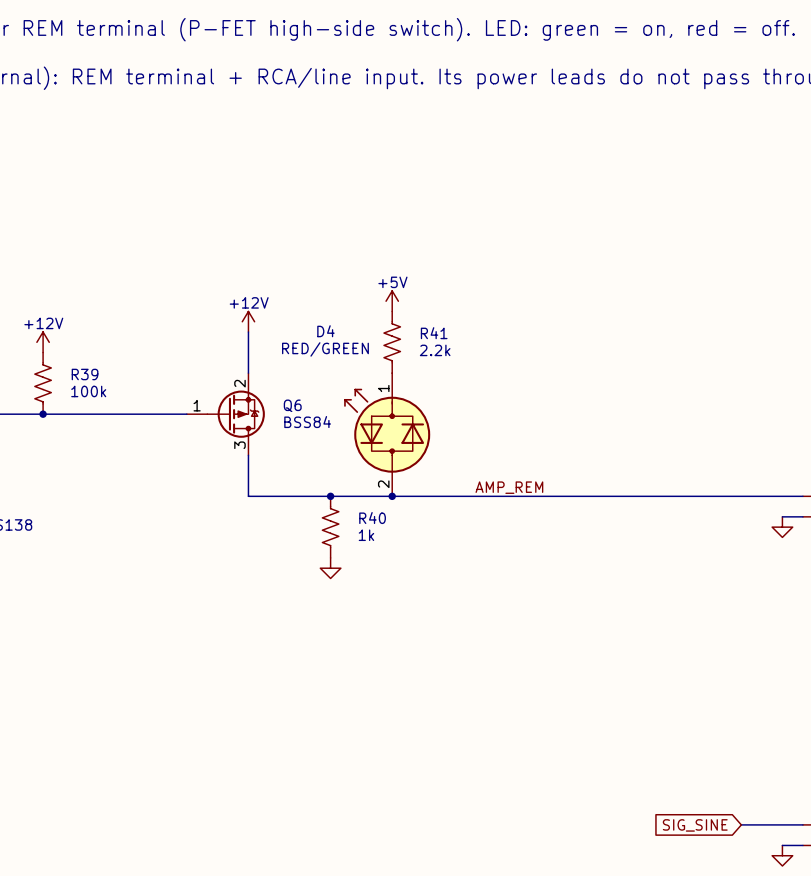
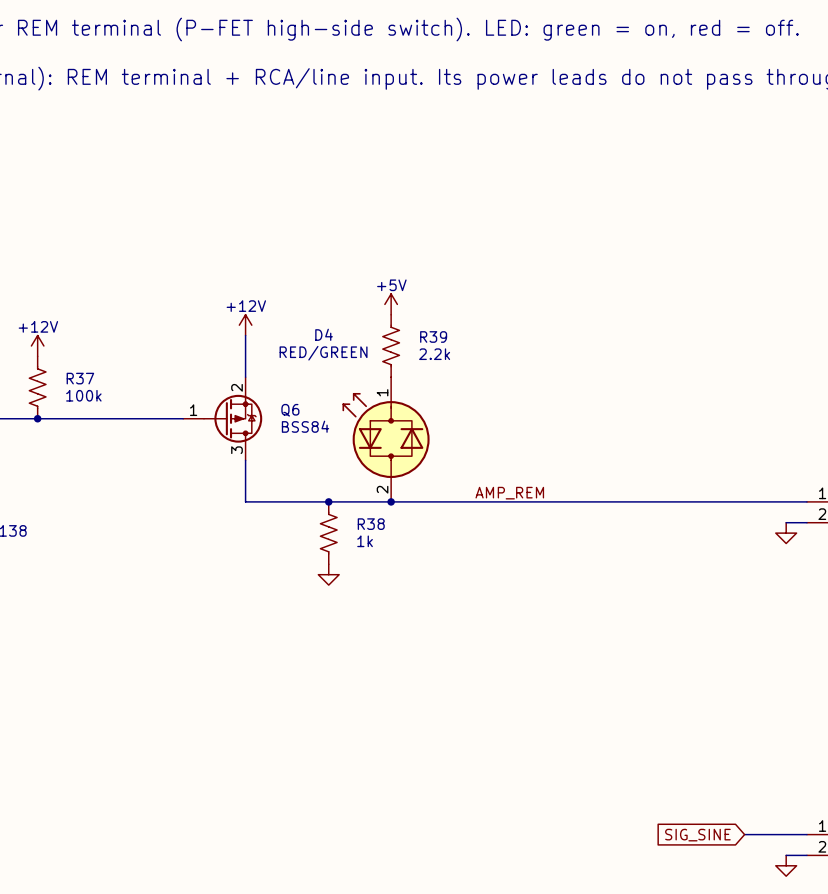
R41 name: R41 (434, 333) -> R39 (433, 336)
R39 name: R39 (85, 374) -> R37 (80, 378)
R40 name: R40 (372, 518) -> R38 (371, 524)

